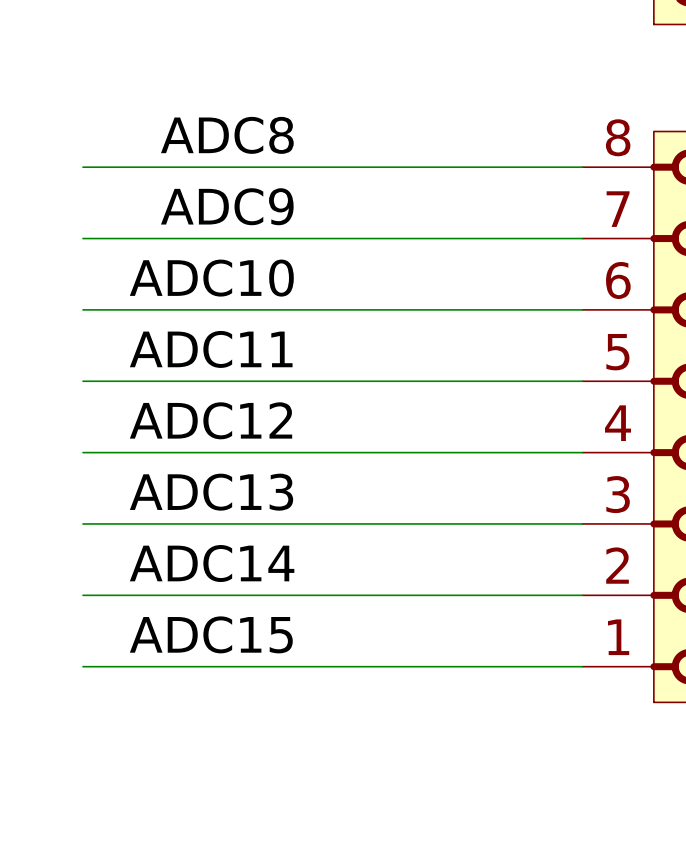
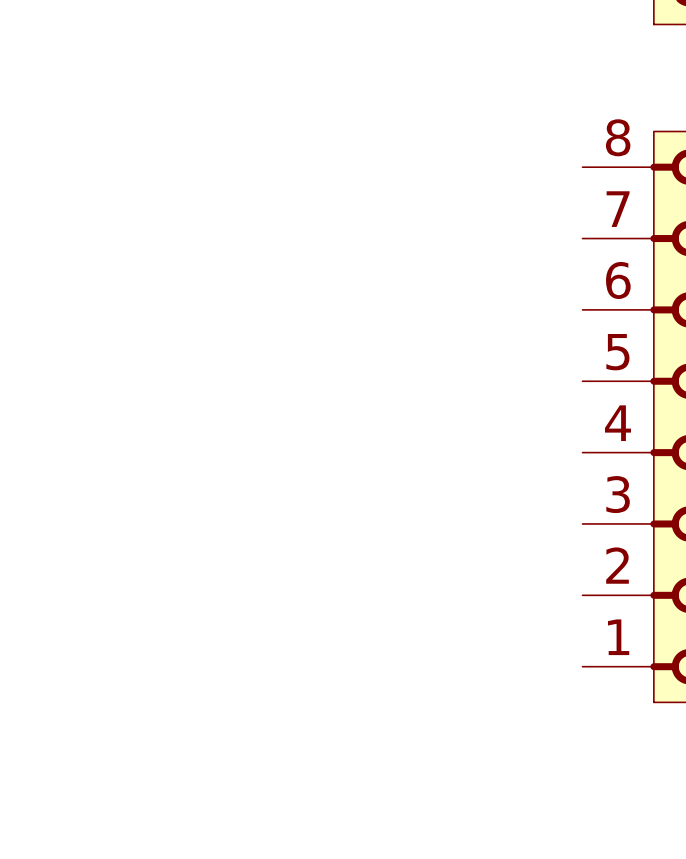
label: ADC8 (227, 135) -> none
wire: (82, 167) (582, 167) -> none
label: ADC9 (227, 206) -> none
wire: (82, 238) (582, 238) -> none
label: ADC10 (211, 278) -> none
wire: (82, 309) (582, 309) -> none
label: ADC11 (211, 349) -> none
wire: (82, 381) (582, 381) -> none
label: ADC12 (211, 420) -> none
wire: (82, 452) (582, 452) -> none
label: ADC13 (211, 492) -> none
wire: (82, 523) (582, 523) -> none
label: ADC14 (212, 563) -> none
wire: (82, 595) (582, 595) -> none
label: ADC15 (211, 634) -> none
wire: (82, 666) (582, 666) -> none

